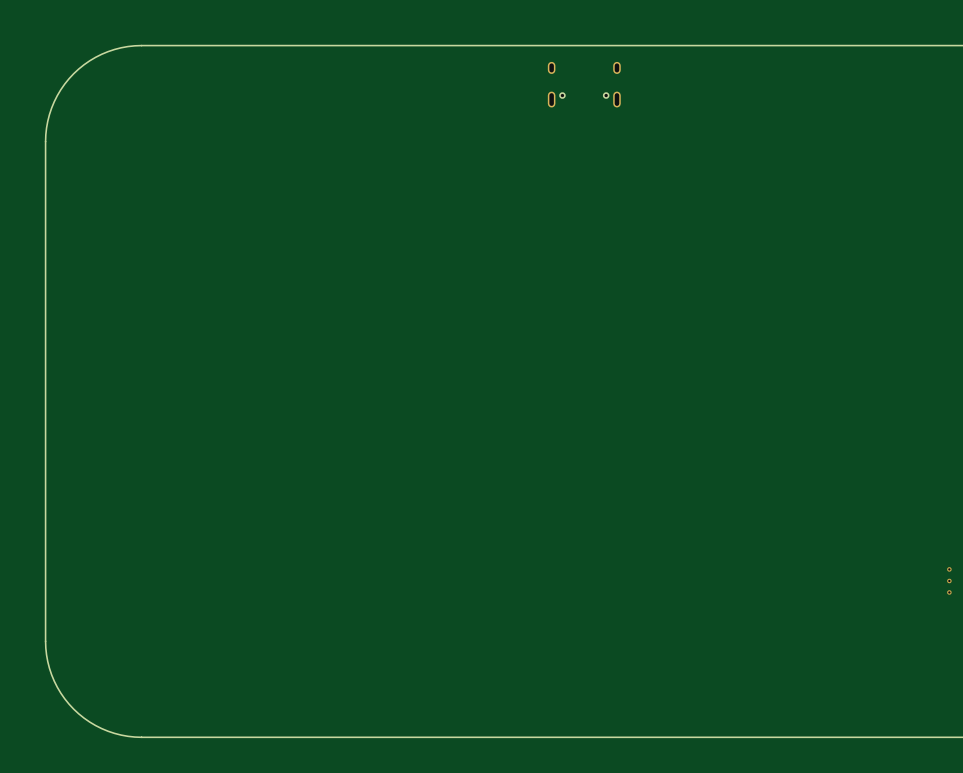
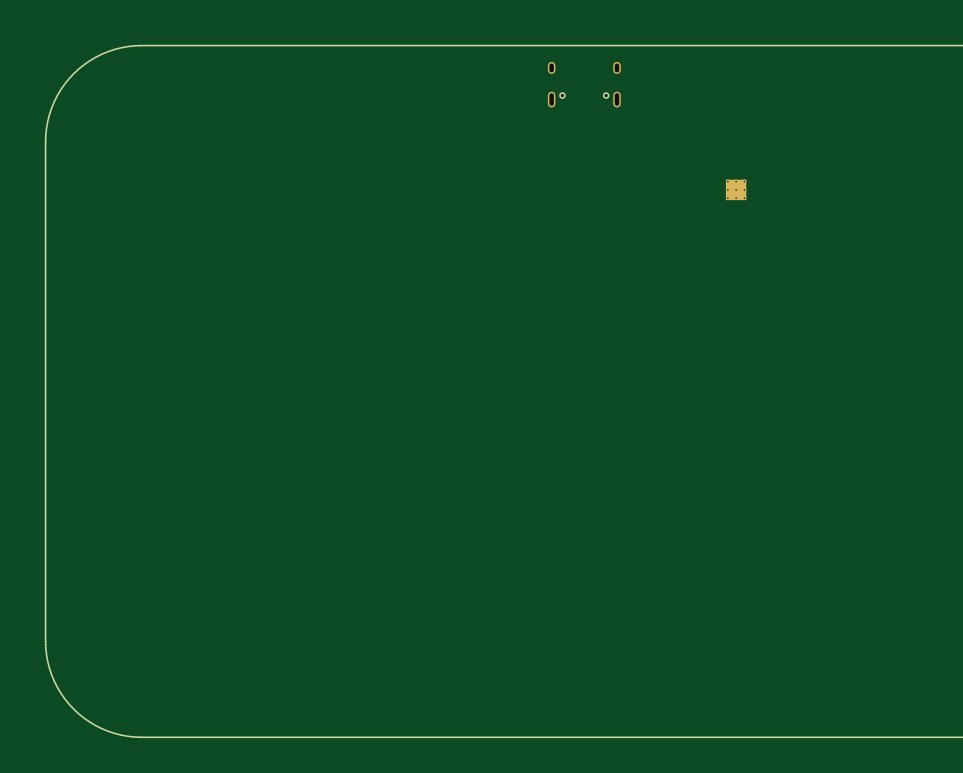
part: none -> (736, 189)
via: (949, 569) -> none
via: (949, 580) -> none
via: (949, 592) -> none

